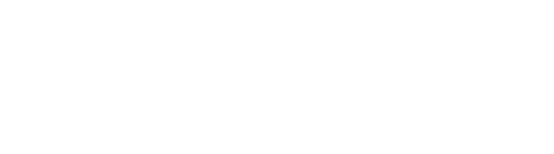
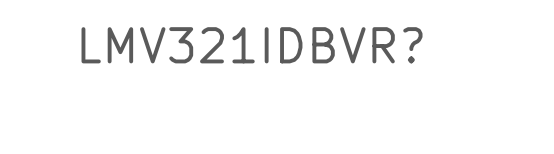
text: none -> LMV321IDBVR? (252, 45)

